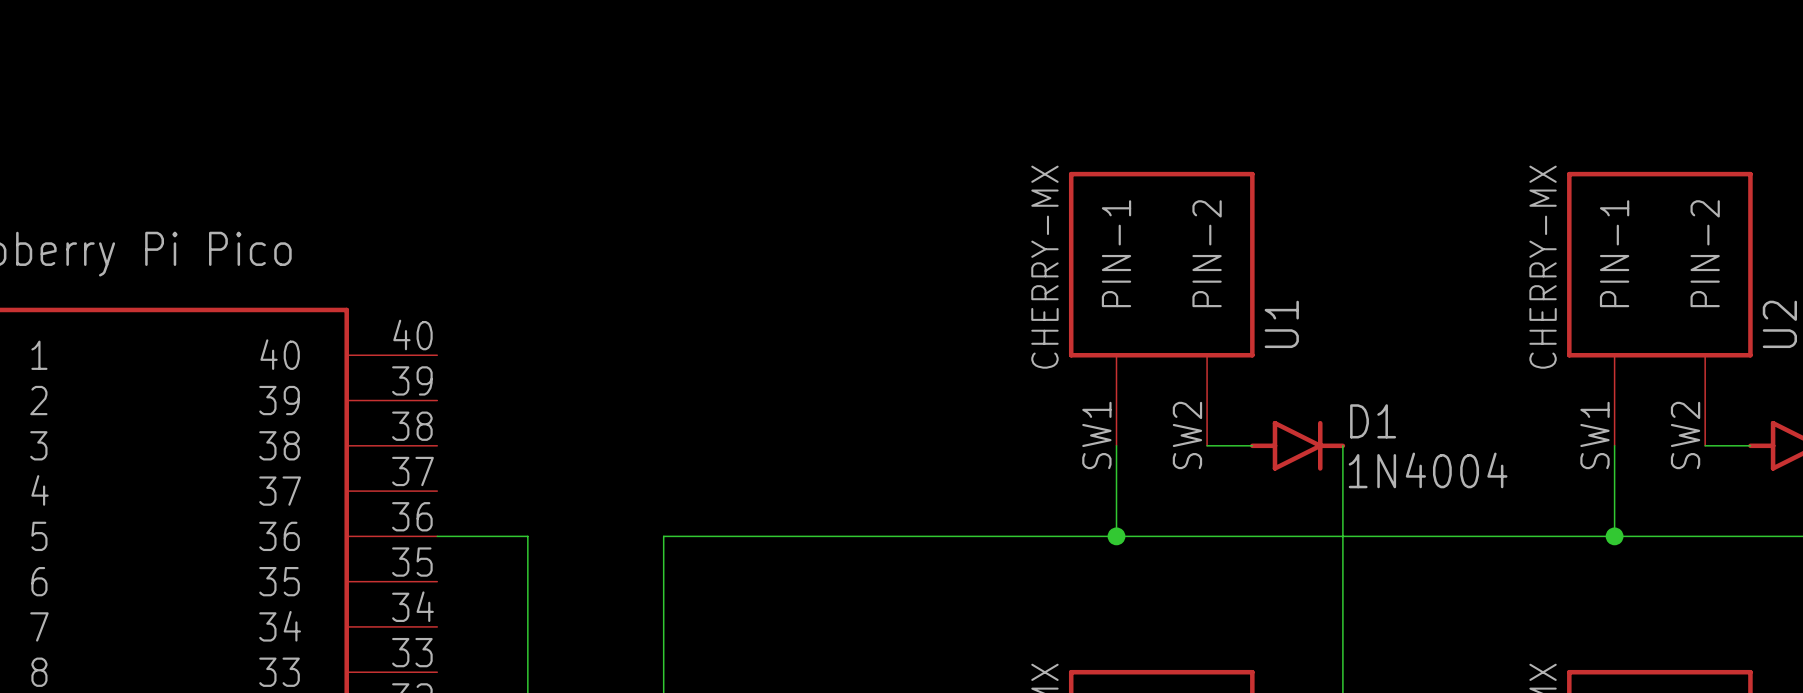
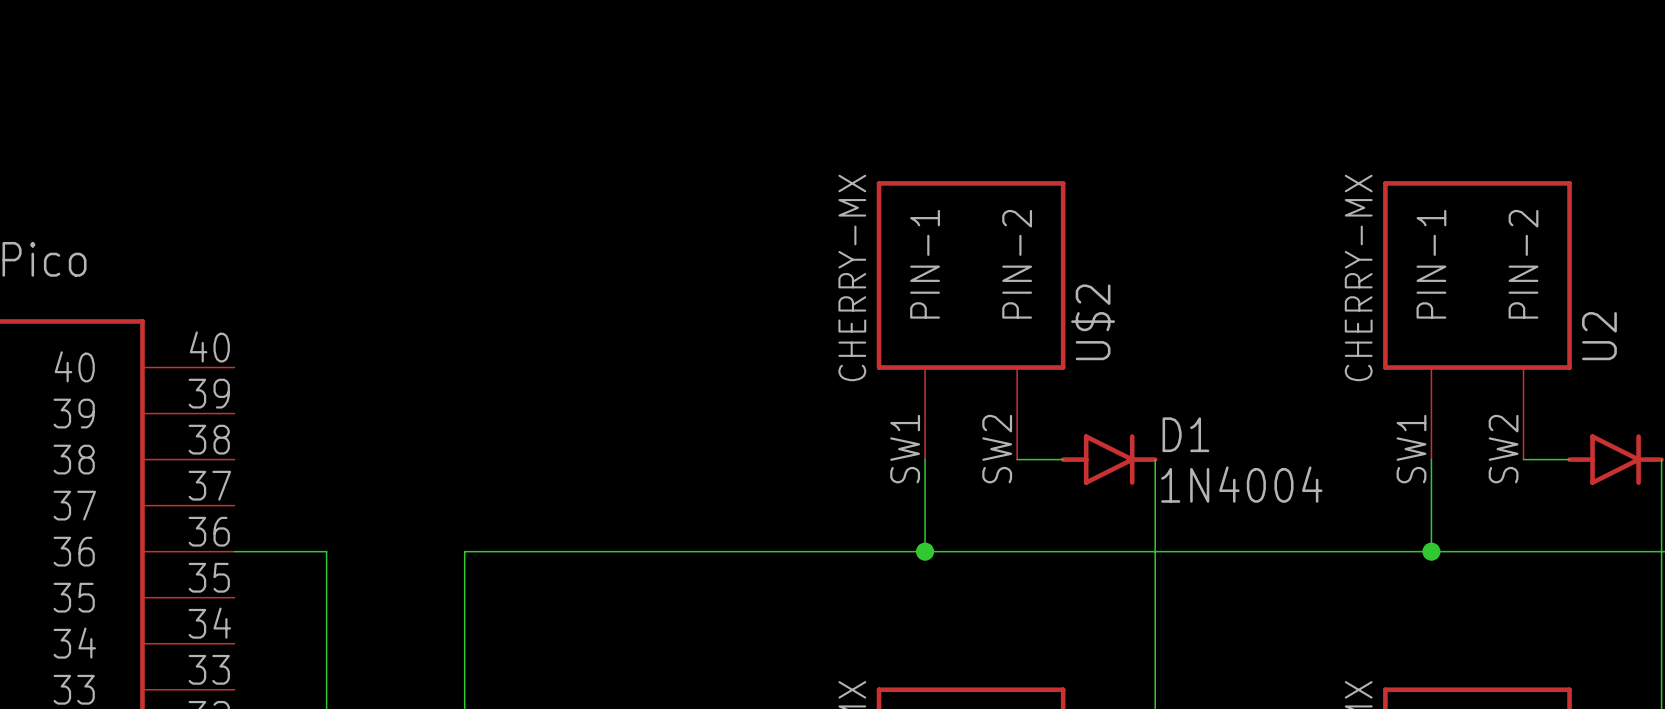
U1 name: U1 (1281, 324) -> U$2 (1093, 322)

